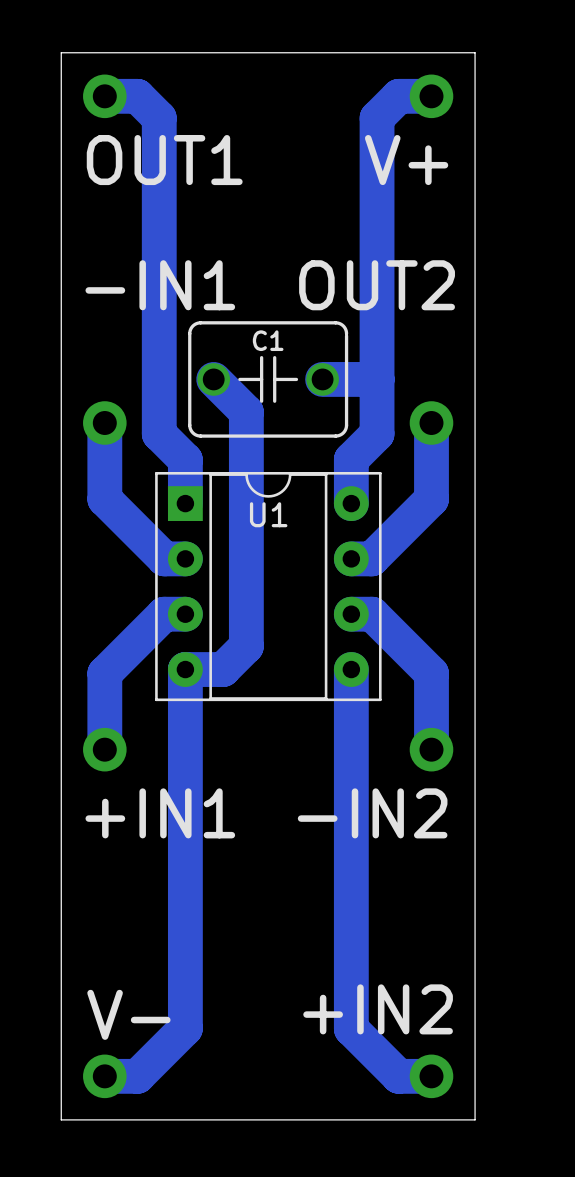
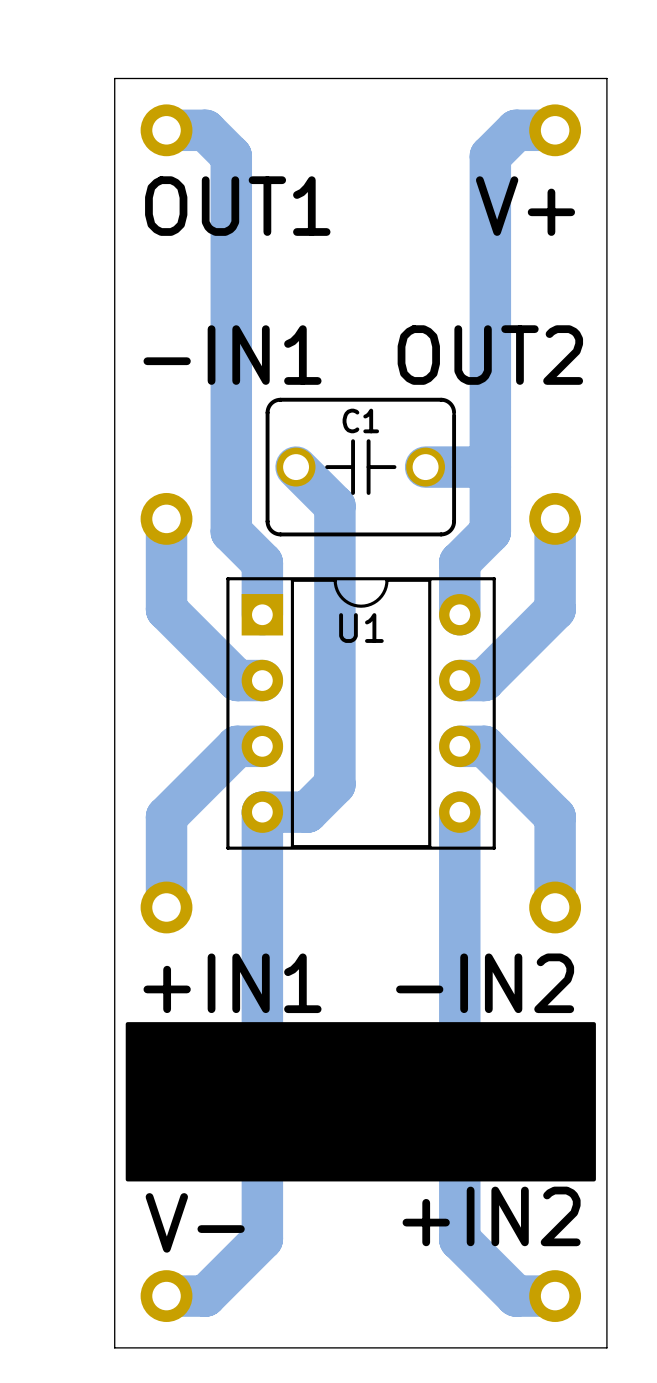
drawing: none -> [125, 1022, 596, 1182]

